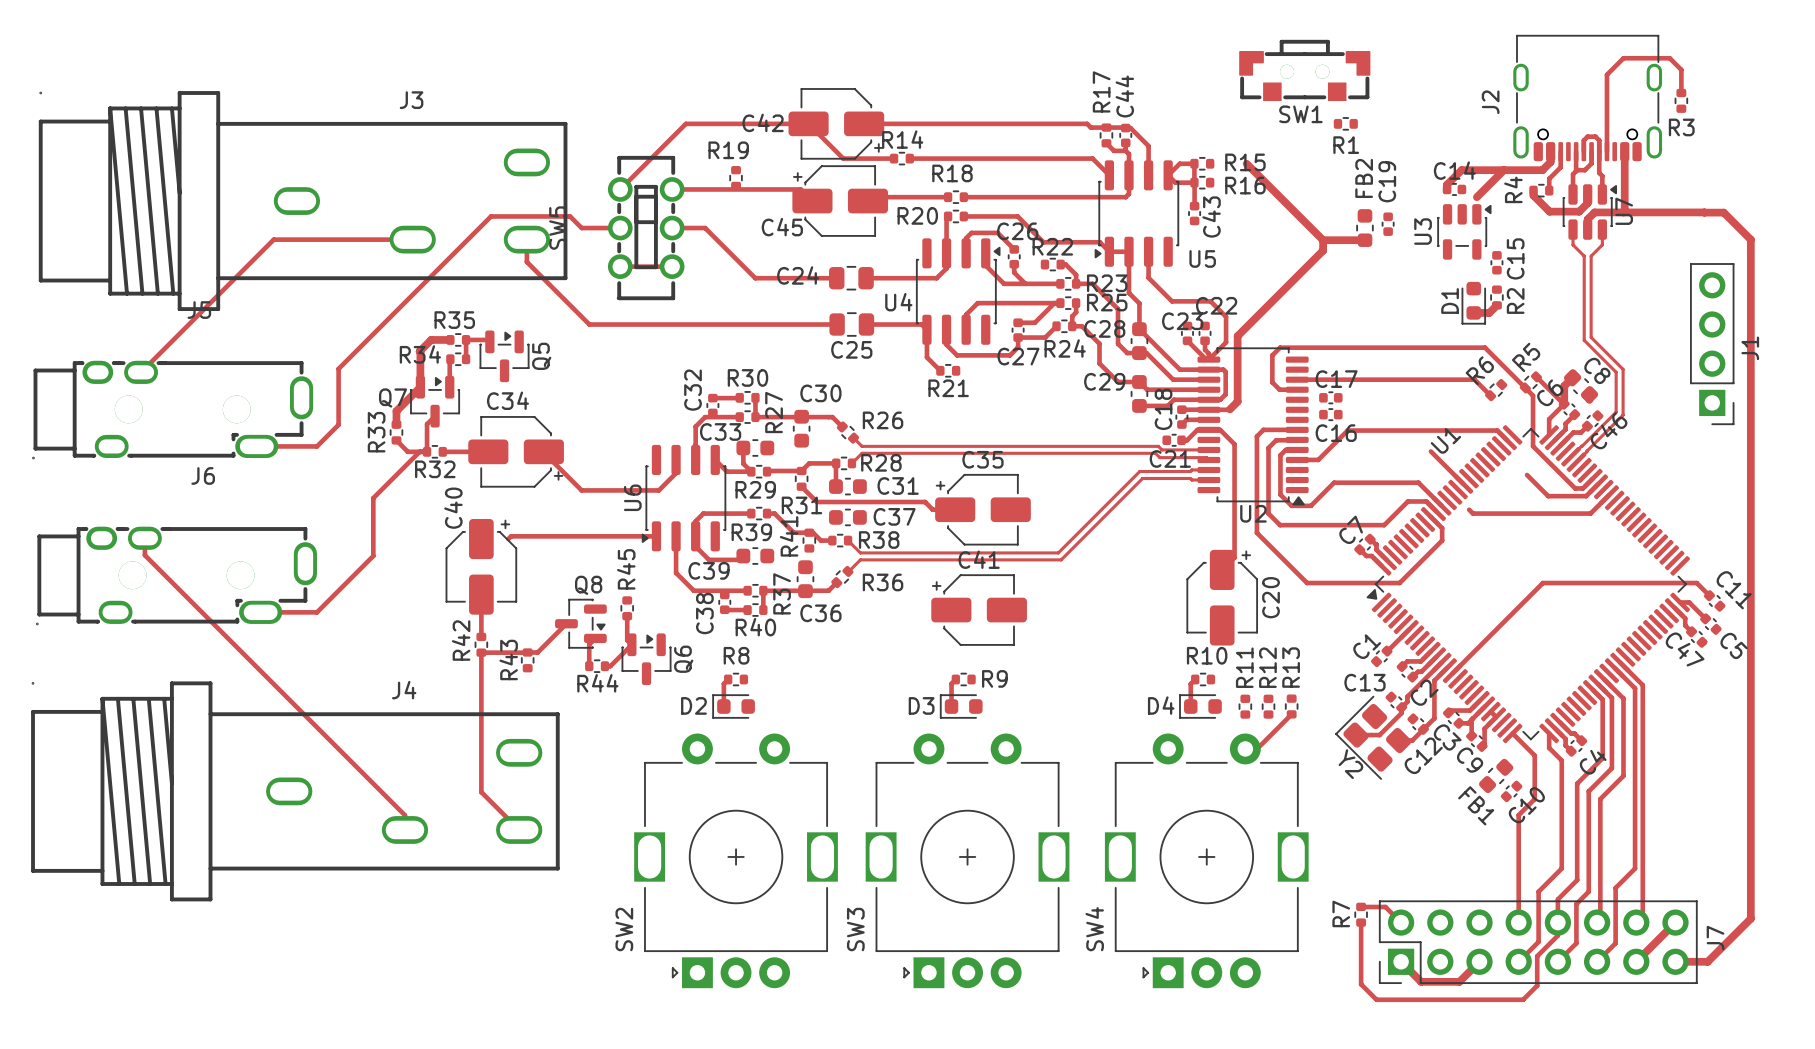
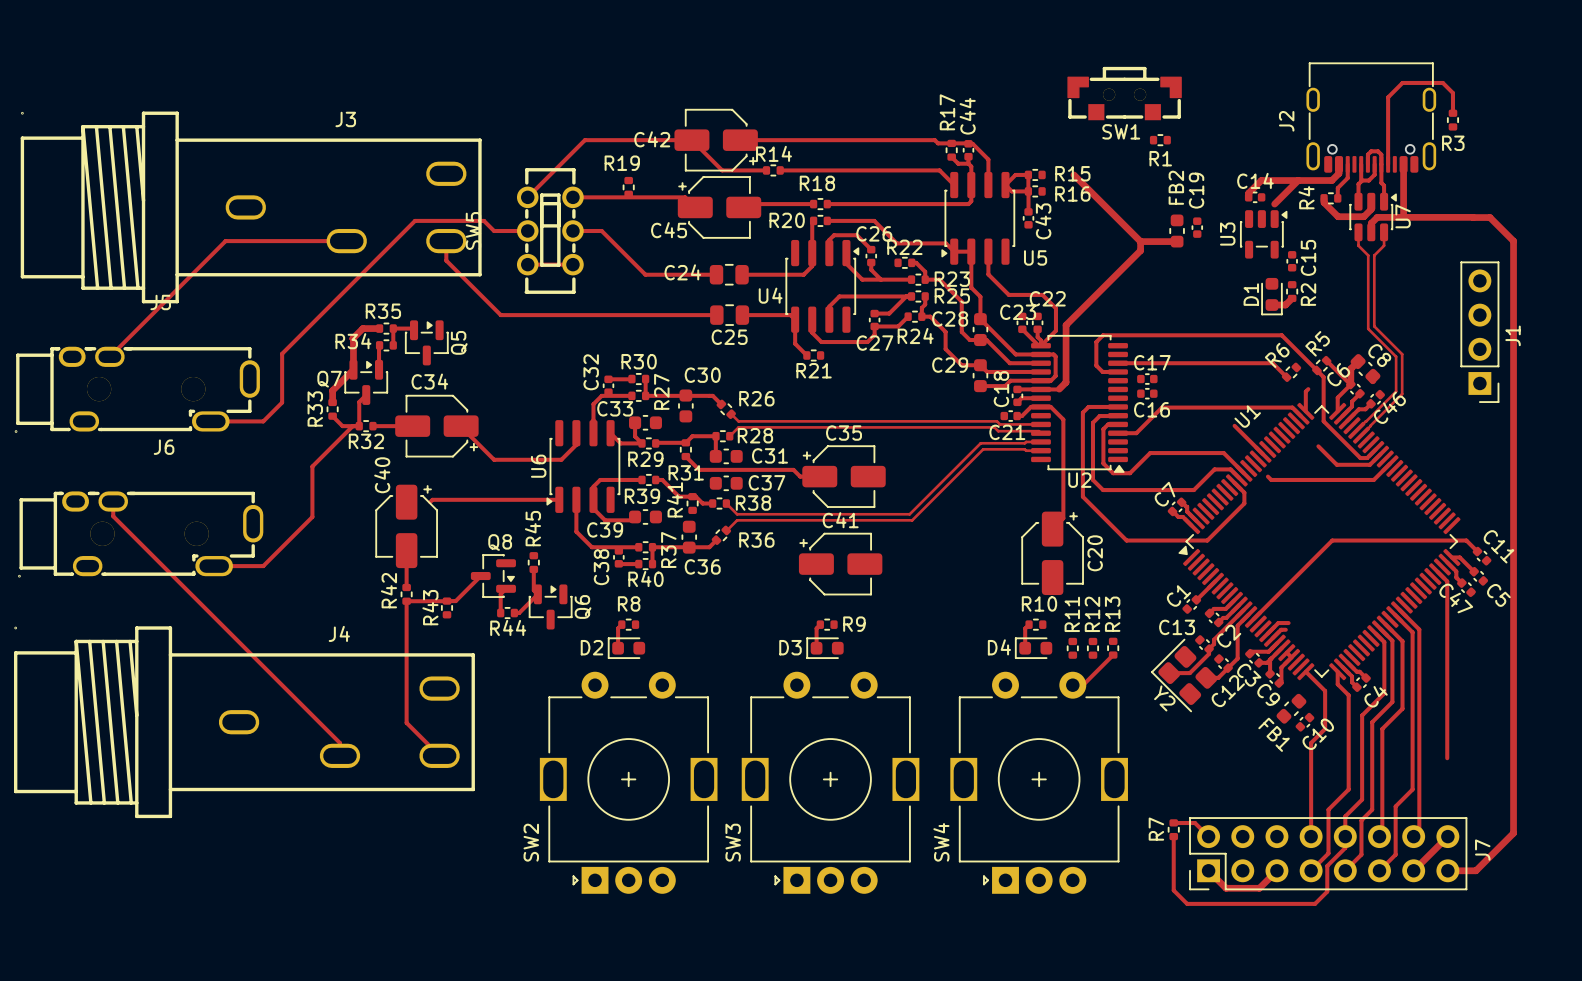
top track: none -> (1308, 389) (1305, 391) (1305, 411)
top track: none -> (1437, 571) (1447, 581) (1447, 758)
top track: none -> (1288, 623) (1278, 623) (1267, 633)
top track: none -> (1285, 629) (1281, 629) (1272, 638)

